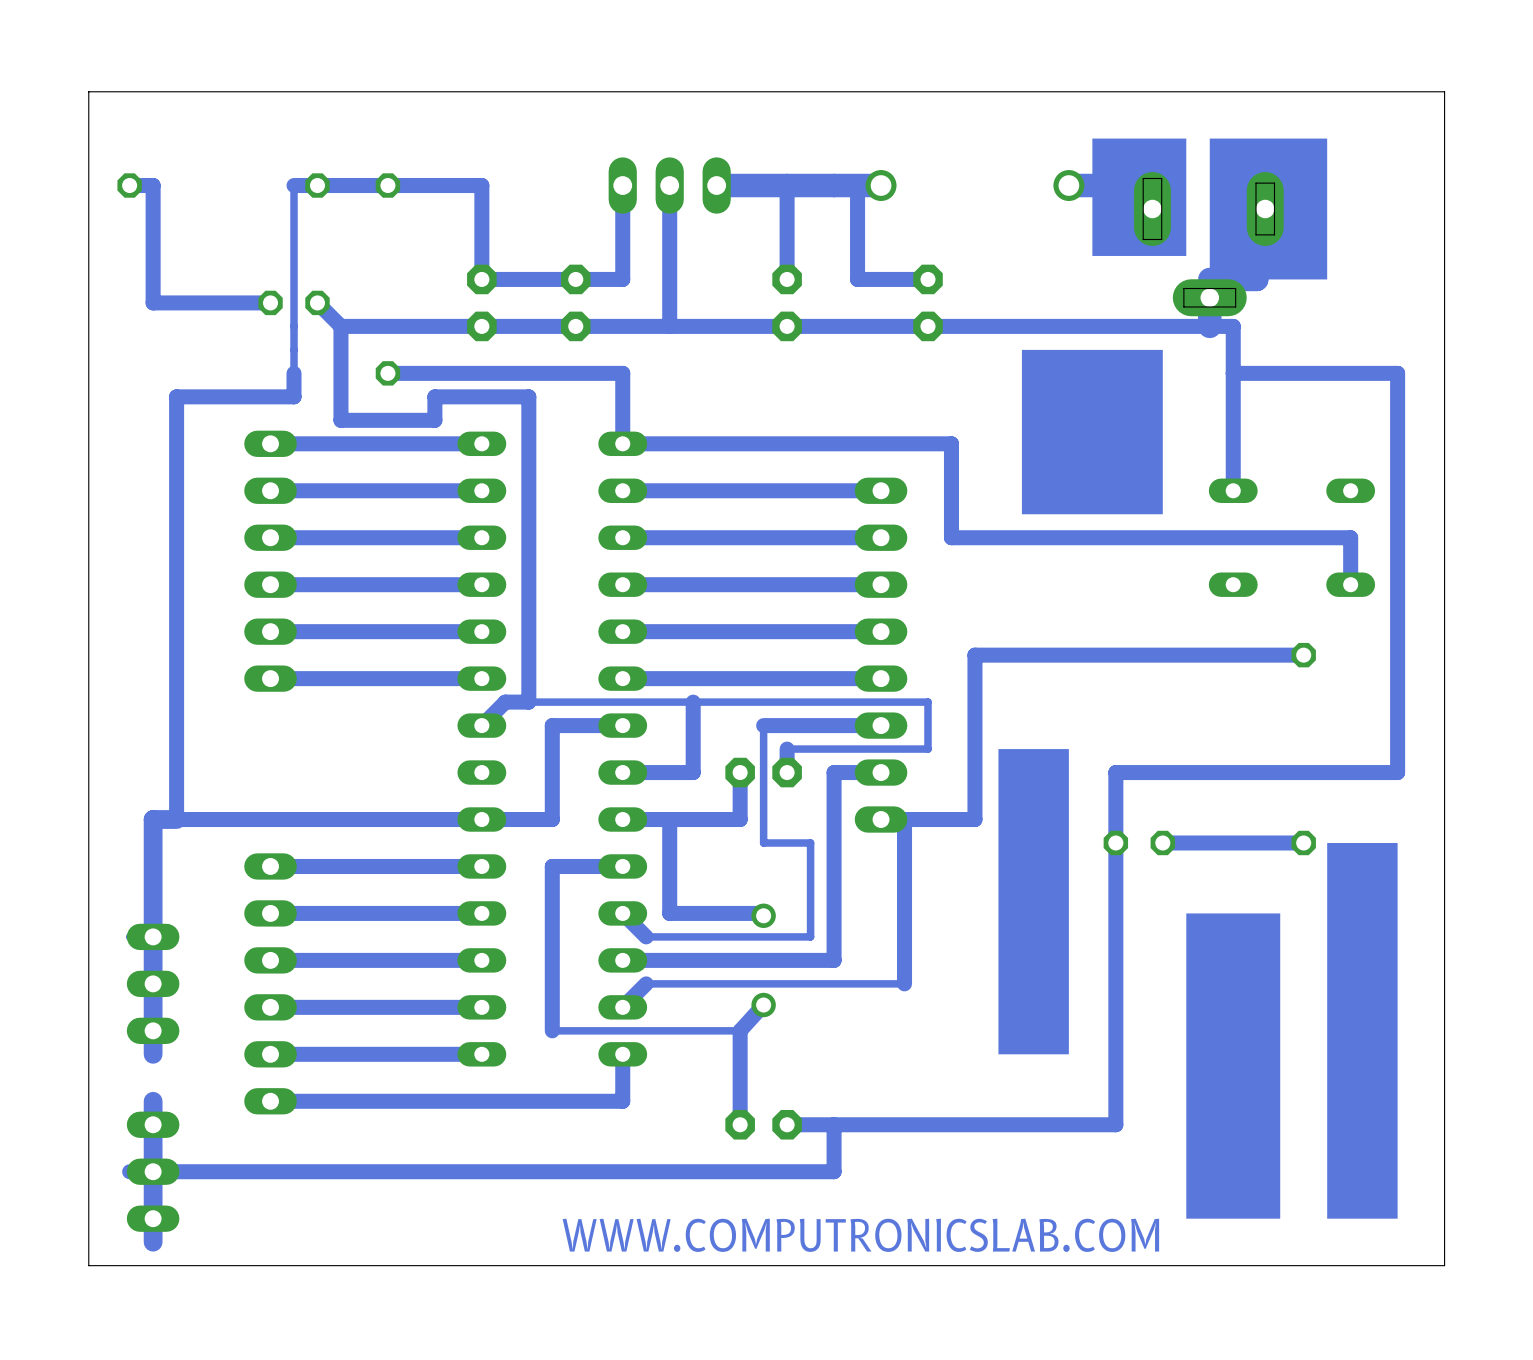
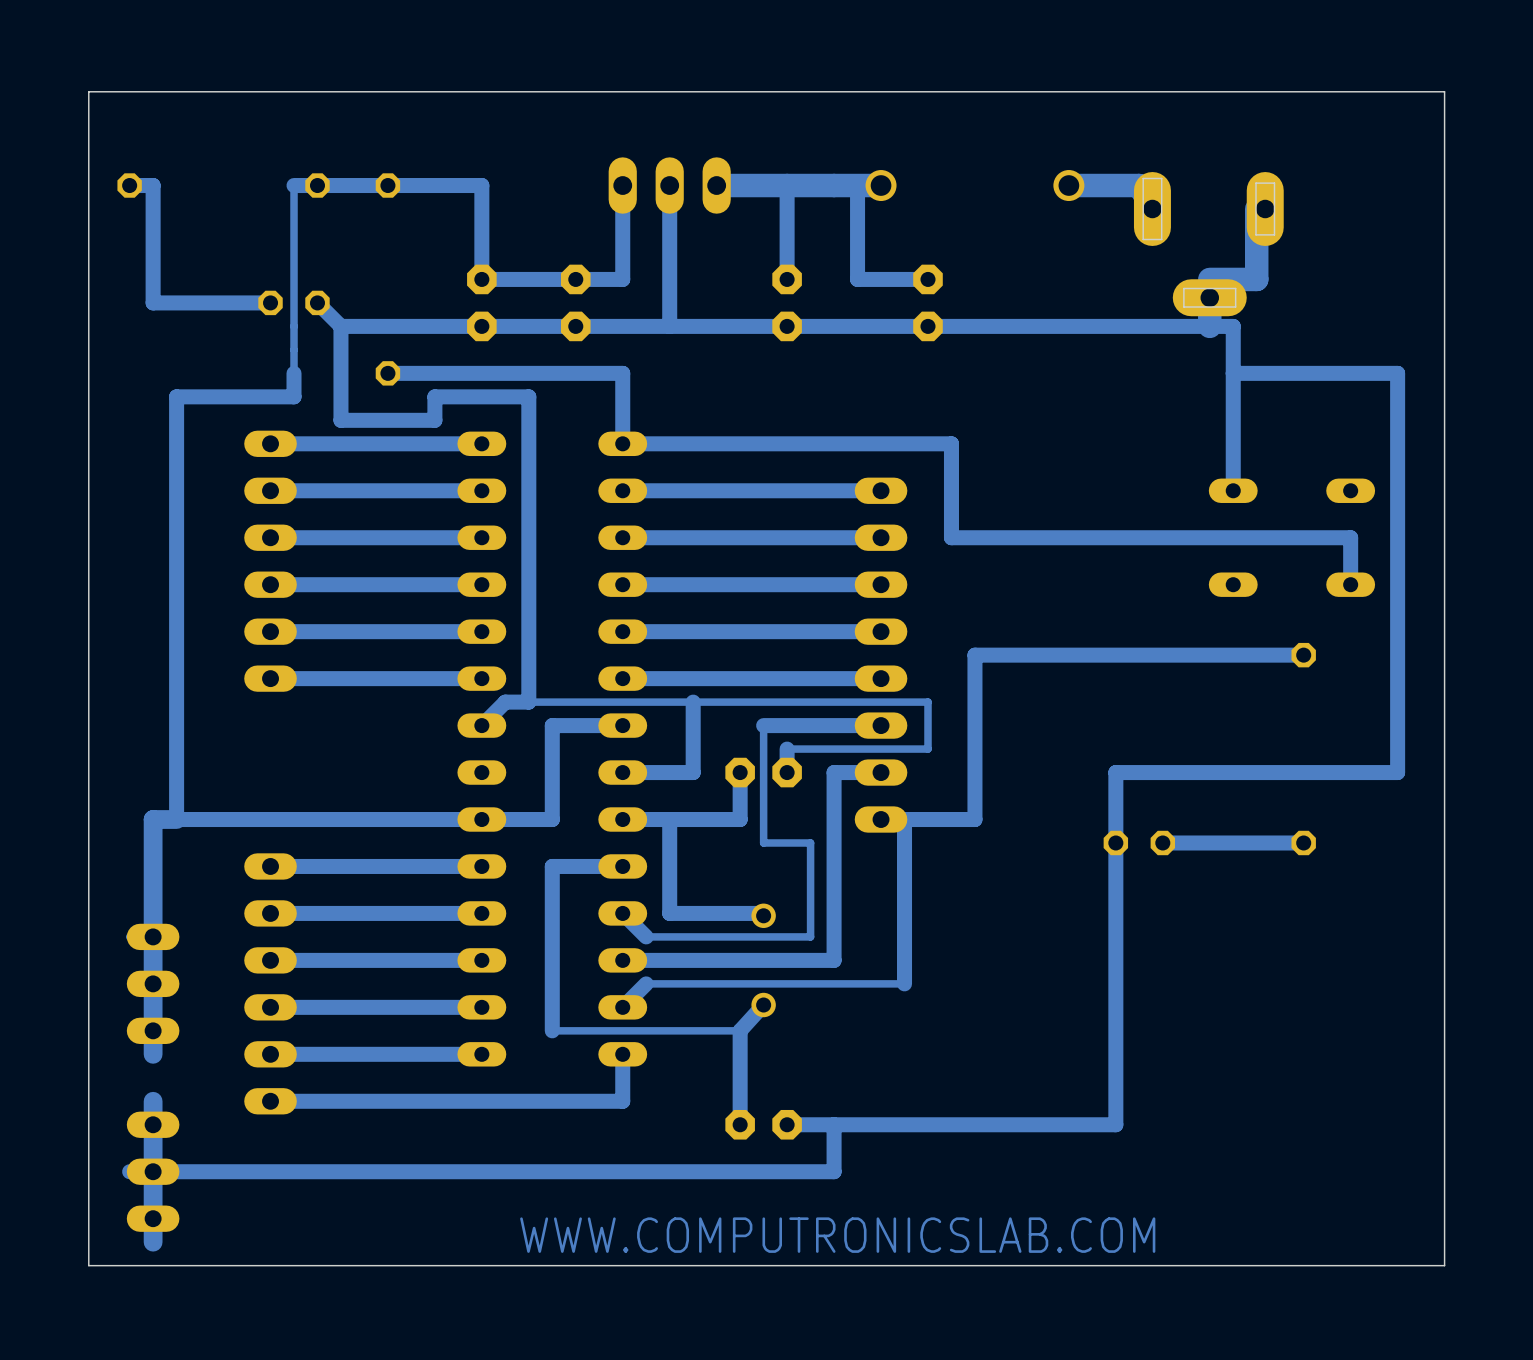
drawing: [1092, 138, 1187, 256] -> none
drawing: [1209, 138, 1328, 280] -> none
drawing: [1021, 349, 1163, 515] -> none
drawing: [998, 749, 1069, 1055] -> none
drawing: [1327, 842, 1398, 1219] -> none
drawing: [1186, 913, 1281, 1219] -> none

